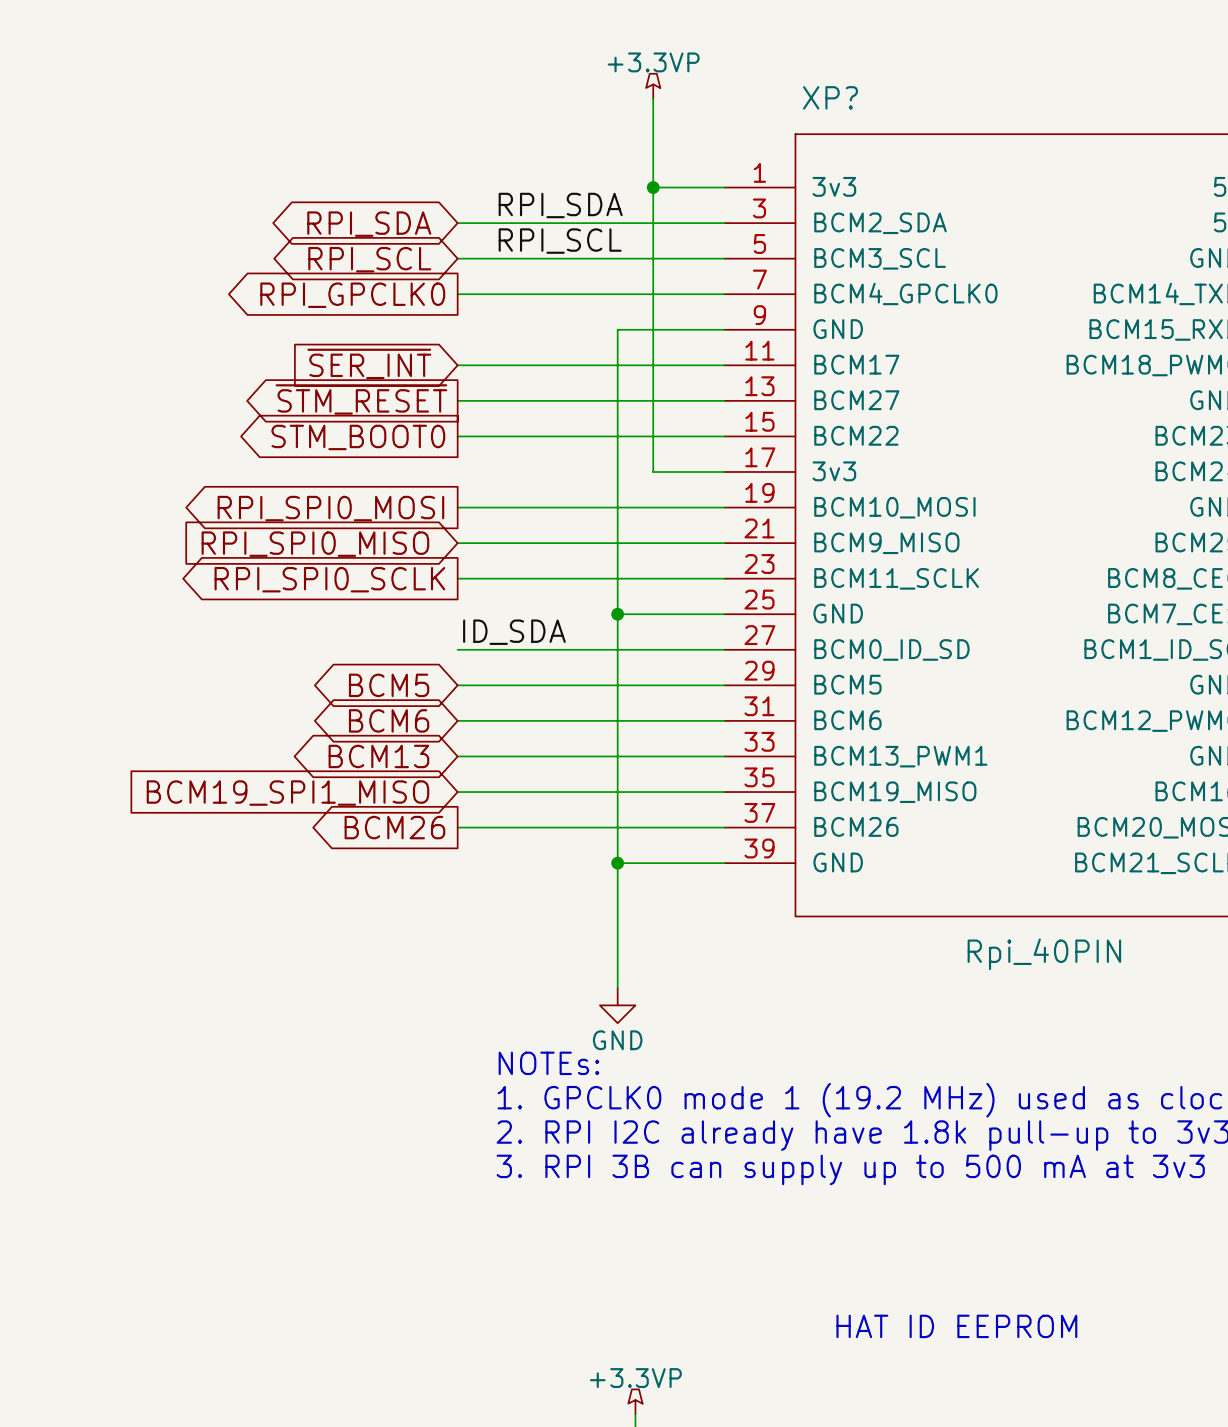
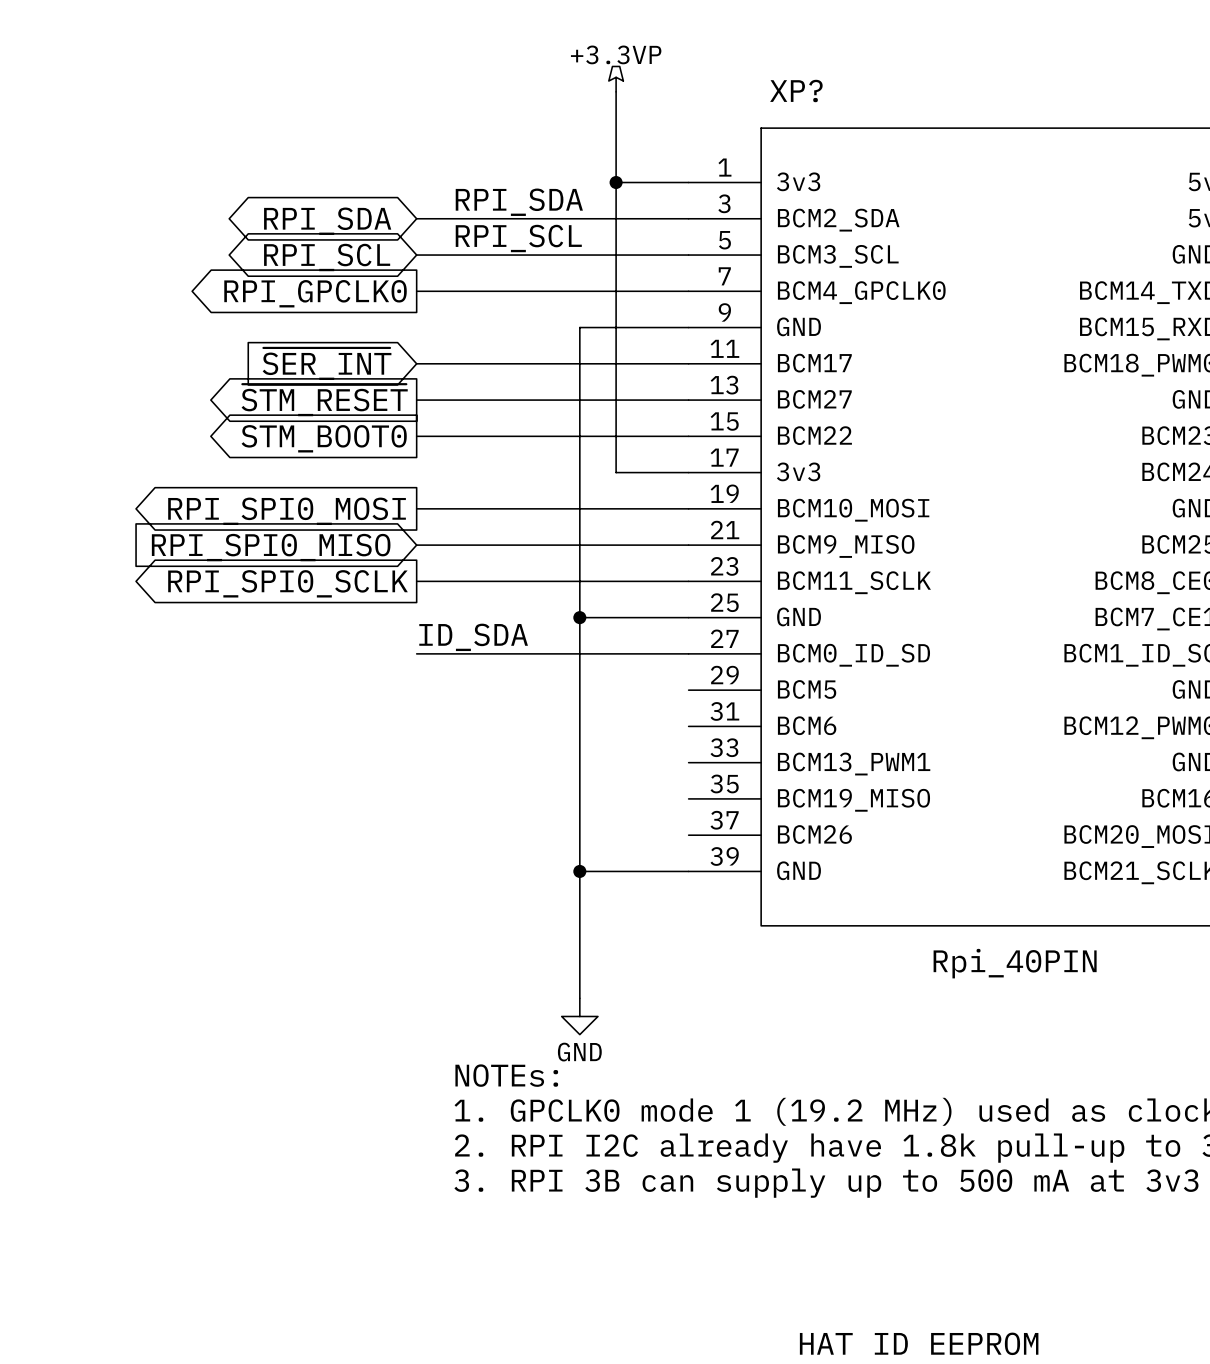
global label: BCM5 (389, 685) -> none
wire: (457, 685) (724, 685) -> none
global label: BCM6 (389, 720) -> none
wire: (457, 720) (724, 720) -> none
global label: BCM13 (378, 756) -> none
wire: (457, 756) (724, 756) -> none
wire: (457, 792) (724, 792) -> none
global label: BCM19_SPI1_MISO (288, 793) -> none
global label: BCM26 (394, 827) -> none
wire: (457, 827) (724, 827) -> none

